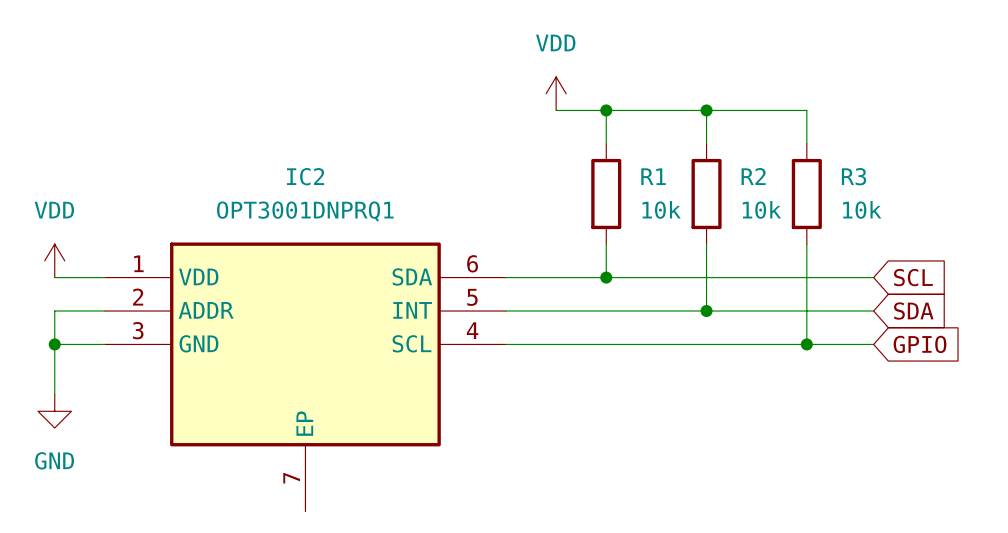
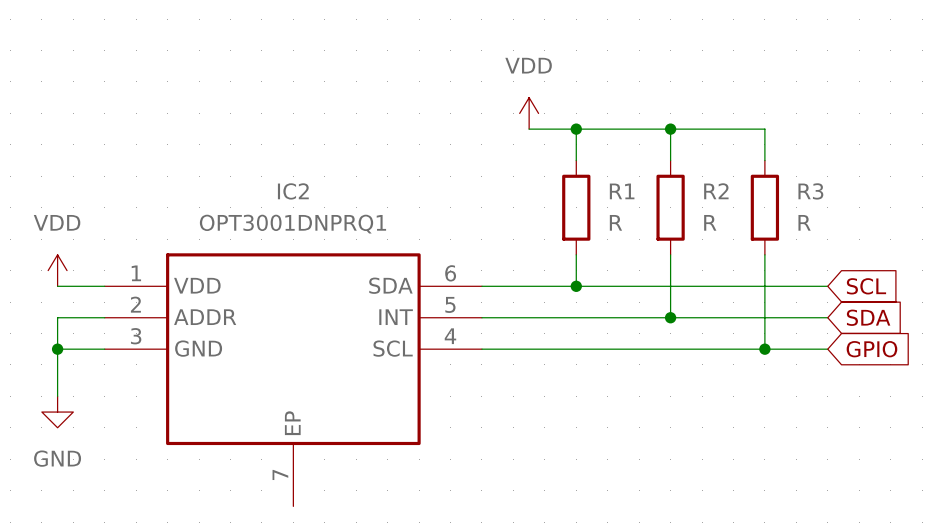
R1 value: 10k (661, 209) -> R (615, 222)
R2 value: 10k (761, 209) -> R (710, 222)
R3 value: 10k (862, 209) -> R (804, 222)

